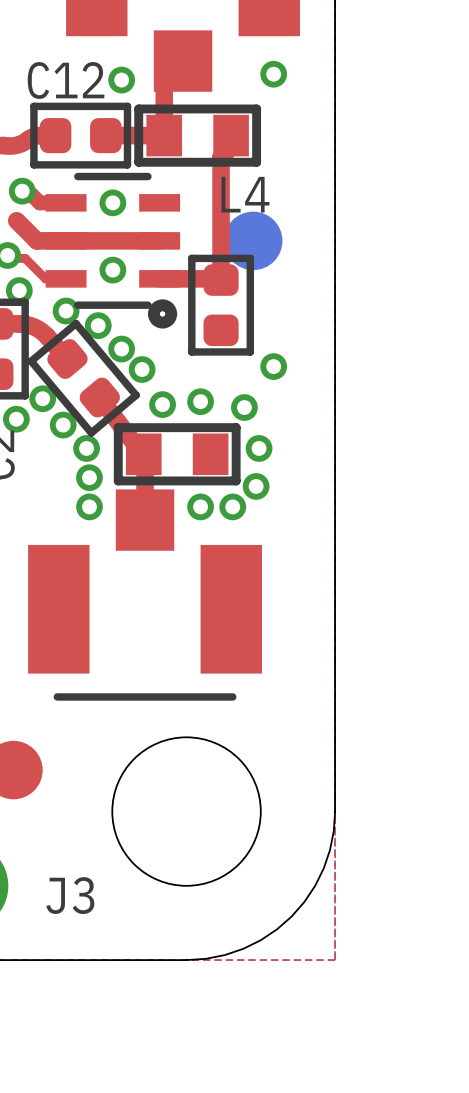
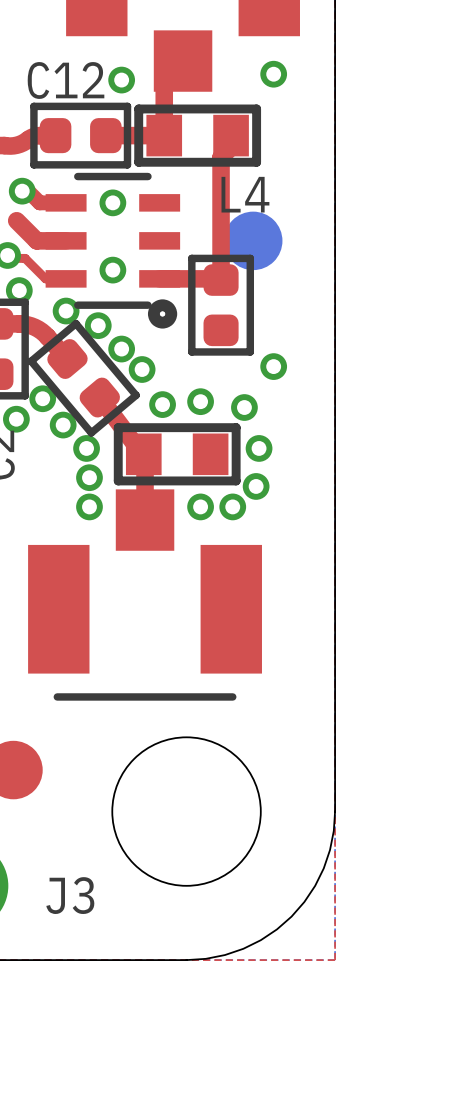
top track: (66, 240) (159, 240) -> none

